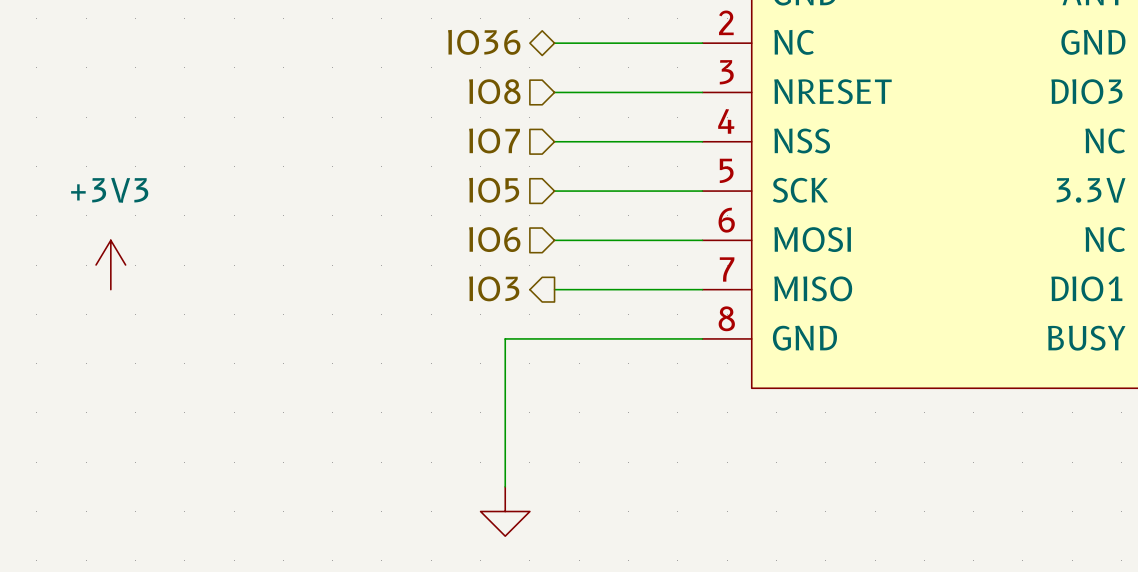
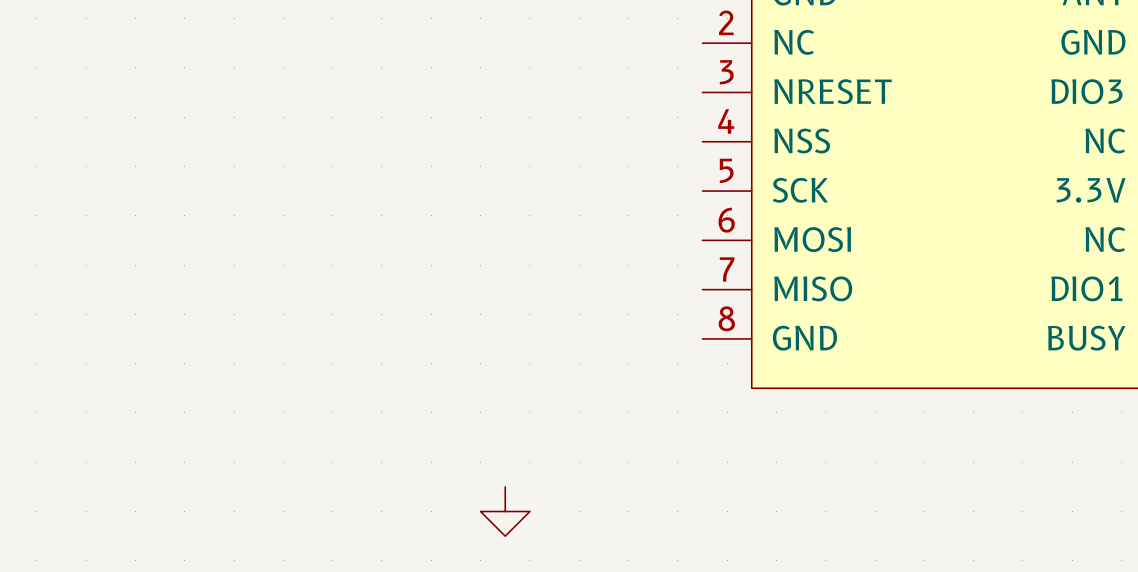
hierarchical label: IO36 (484, 42) -> none
wire: (554, 43) (702, 43) -> none
hierarchical label: IO8 (494, 91) -> none
wire: (554, 92) (702, 92) -> none
hierarchical label: IO7 (494, 140) -> none
wire: (554, 141) (702, 141) -> none
hierarchical label: IO5 (494, 190) -> none
wire: (554, 191) (702, 191) -> none
hierarchical label: IO6 (494, 239) -> none
wire: (554, 240) (702, 240) -> none
power symbol: +3V3 (110, 265) -> none
hierarchical label: IO3 (494, 288) -> none
wire: (554, 289) (702, 289) -> none
wire: (702, 338) (505, 338) (505, 486) -> none

